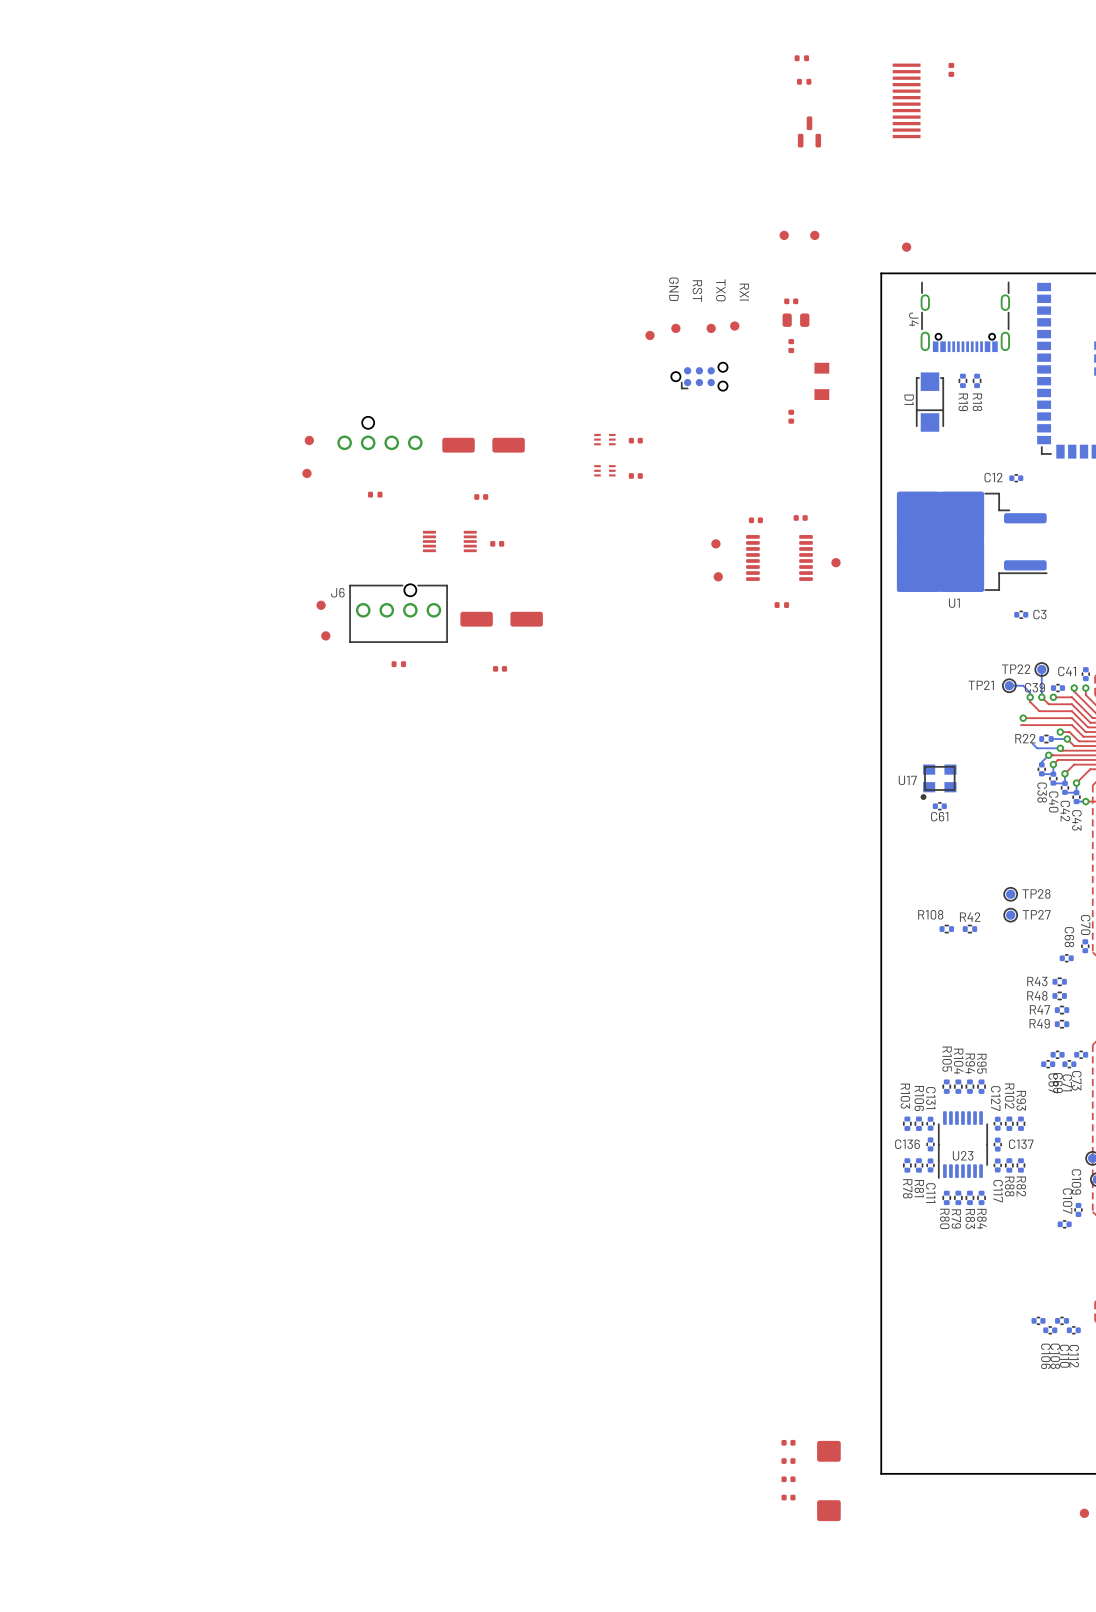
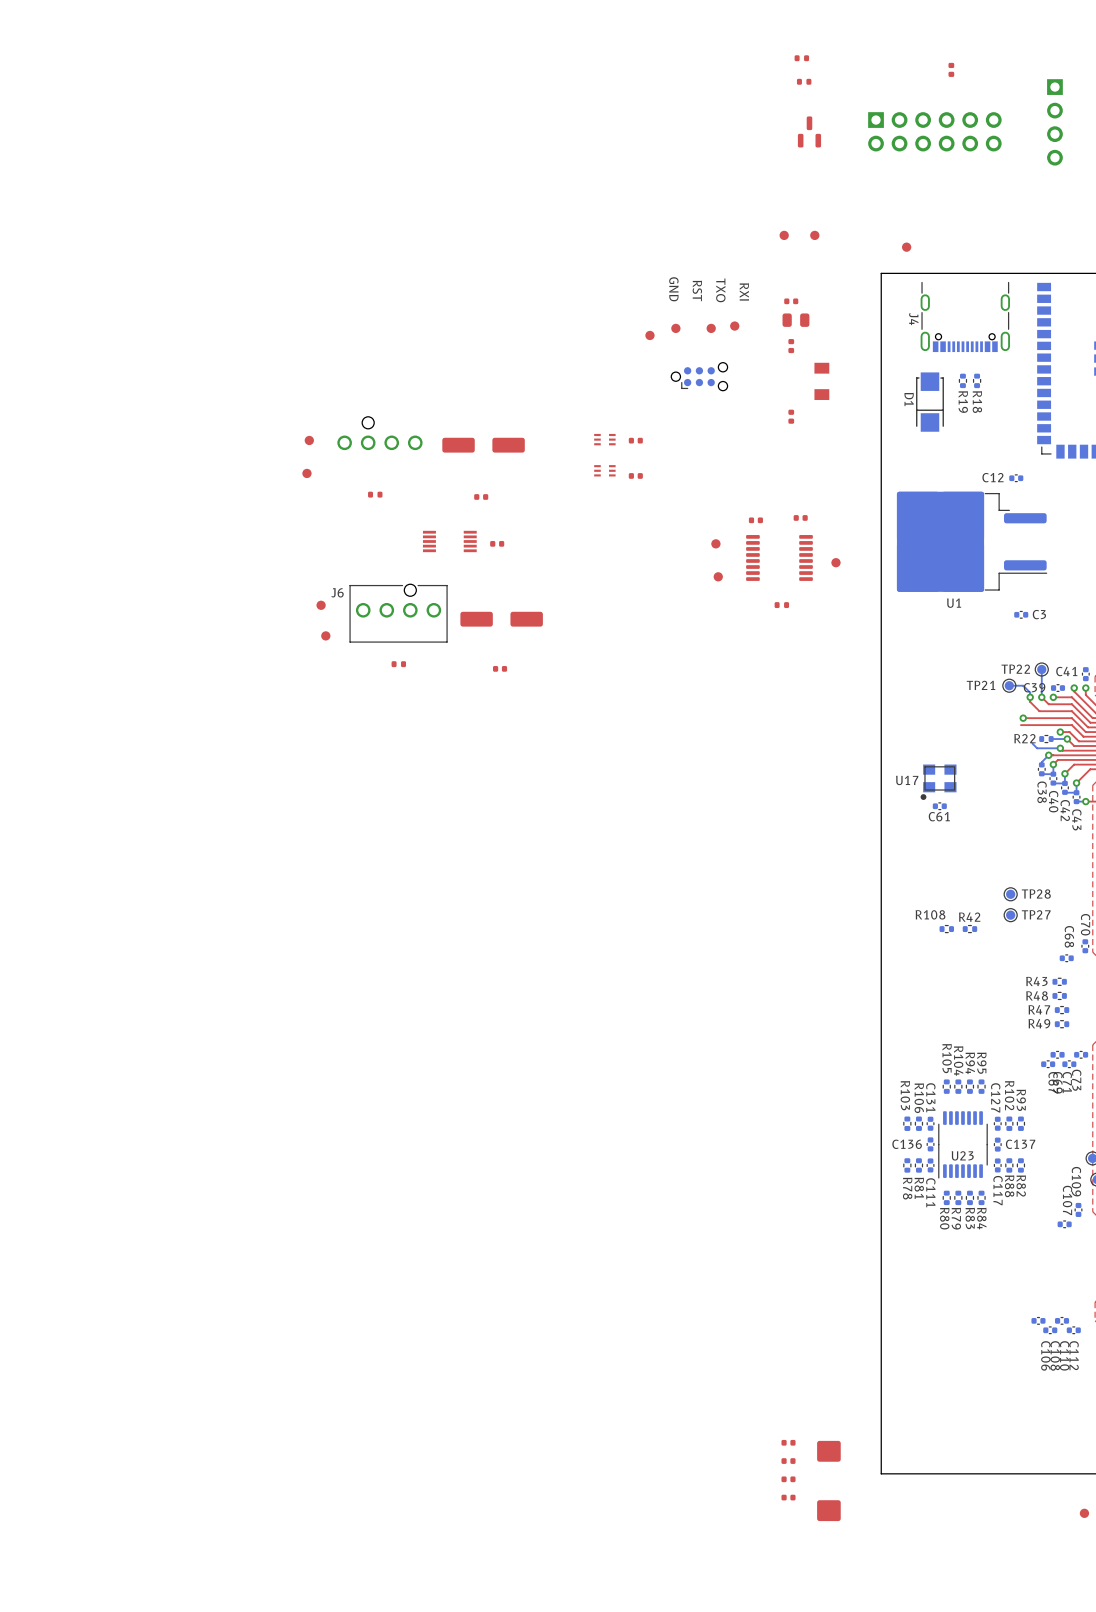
part: (906, 100) -> none
part: none -> (1054, 122)
part: none -> (934, 131)

